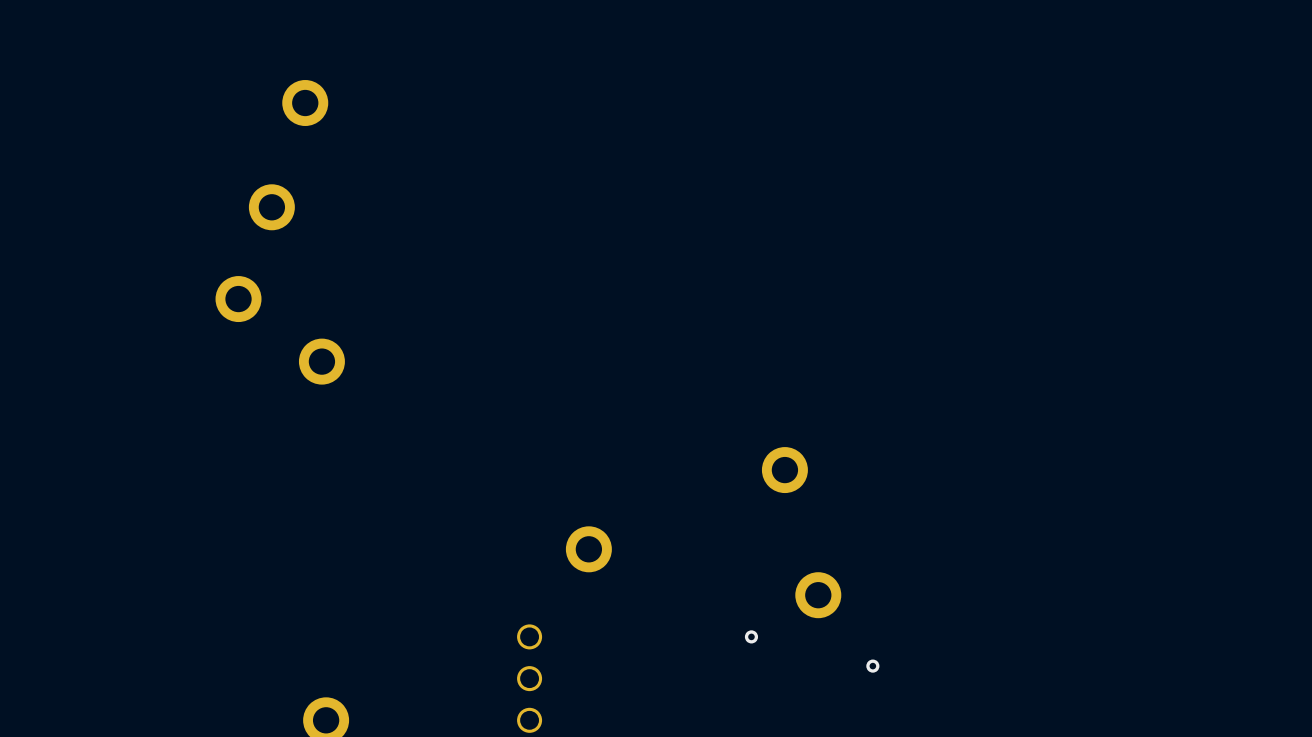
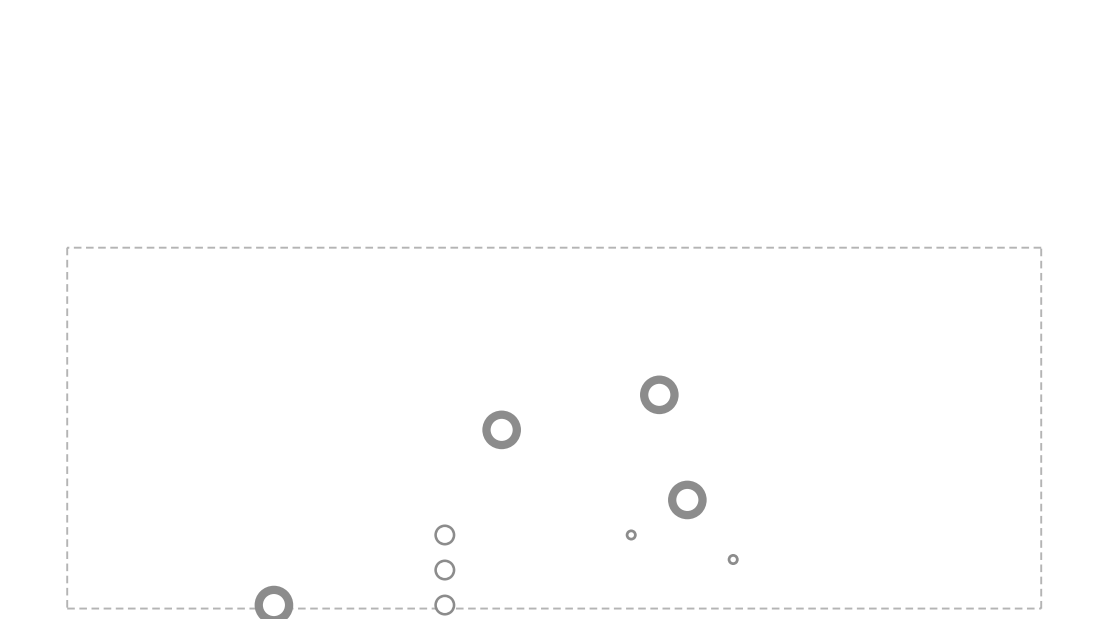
part: (305, 103) -> none
part: (271, 207) -> none
zone outline: none -> (1041, 247) (1041, 608) (67, 608) (67, 247) (1041, 247)
part: (238, 299) -> none
part: (321, 361) -> none
part position: (588, 549) -> (501, 429)

